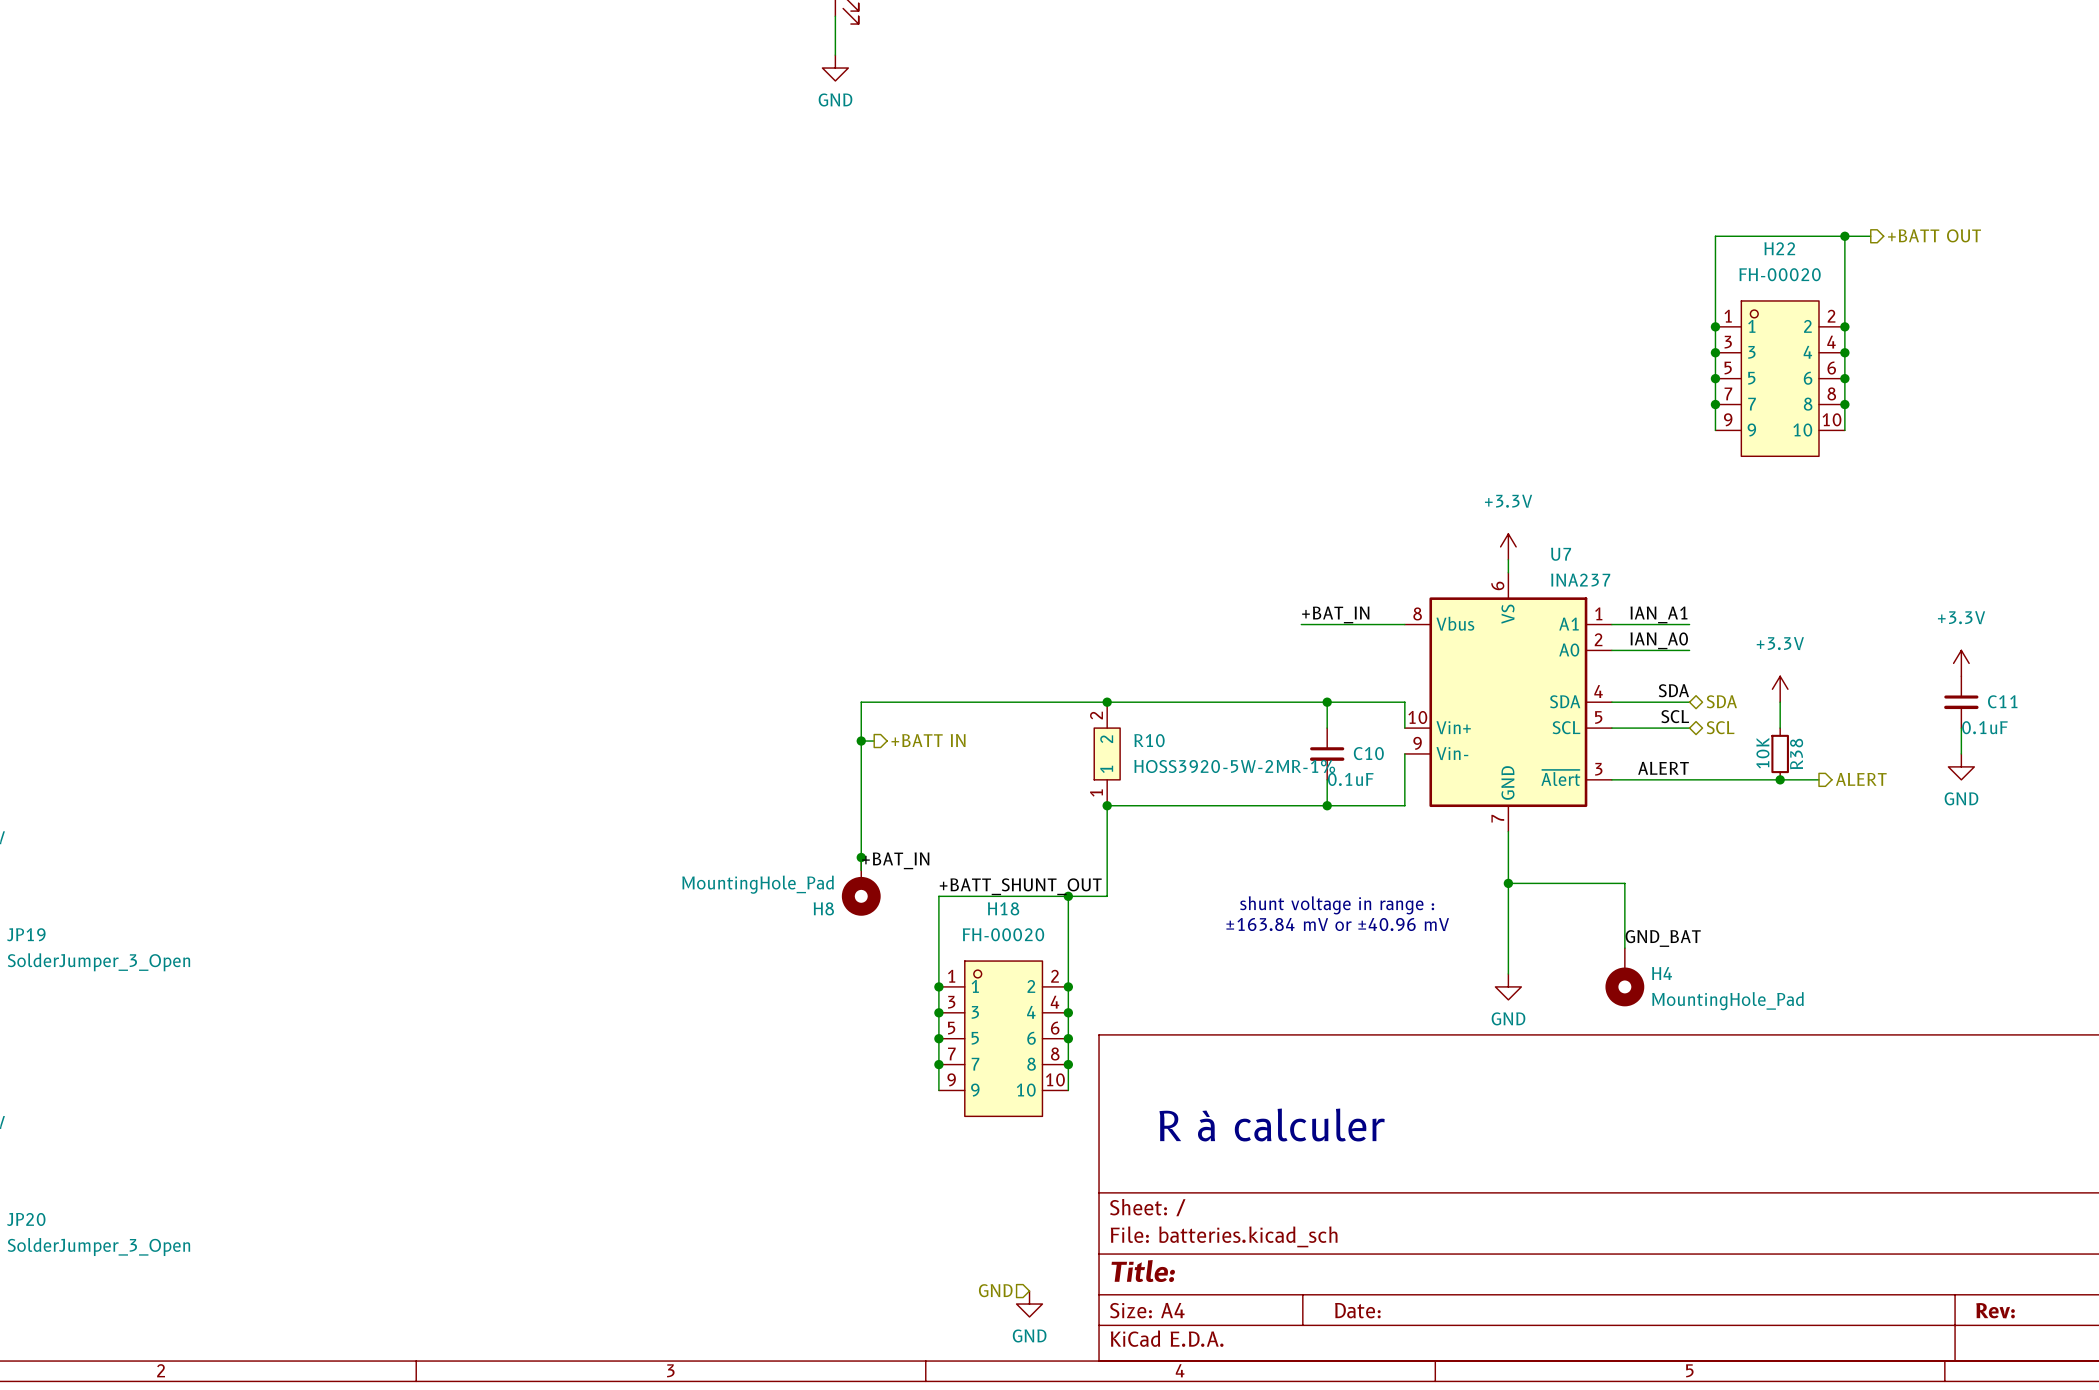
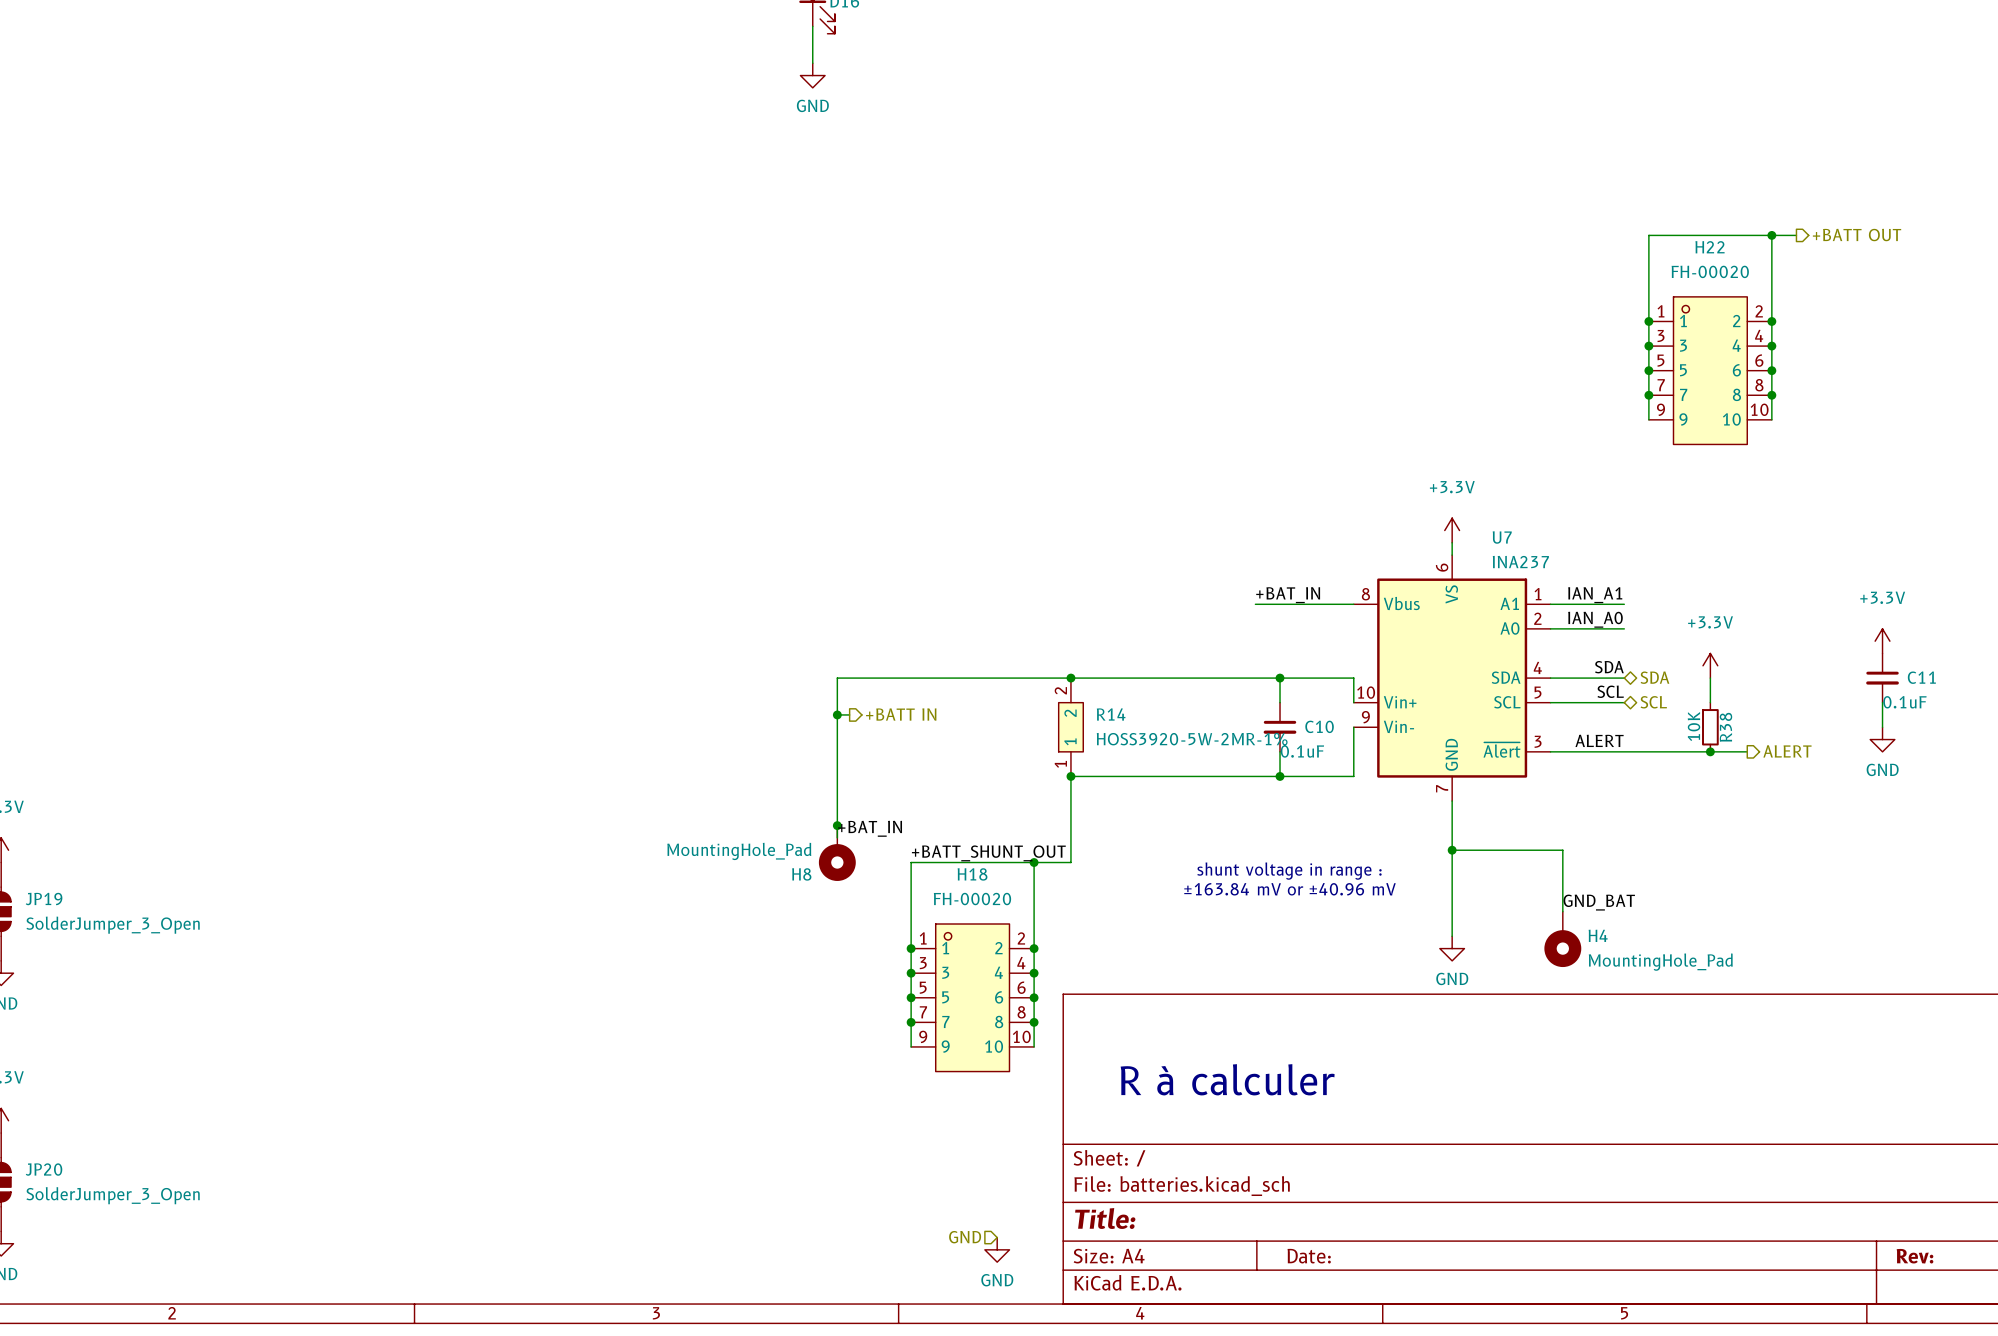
R10 name: R10 (1149, 740) -> R14 (1111, 714)

